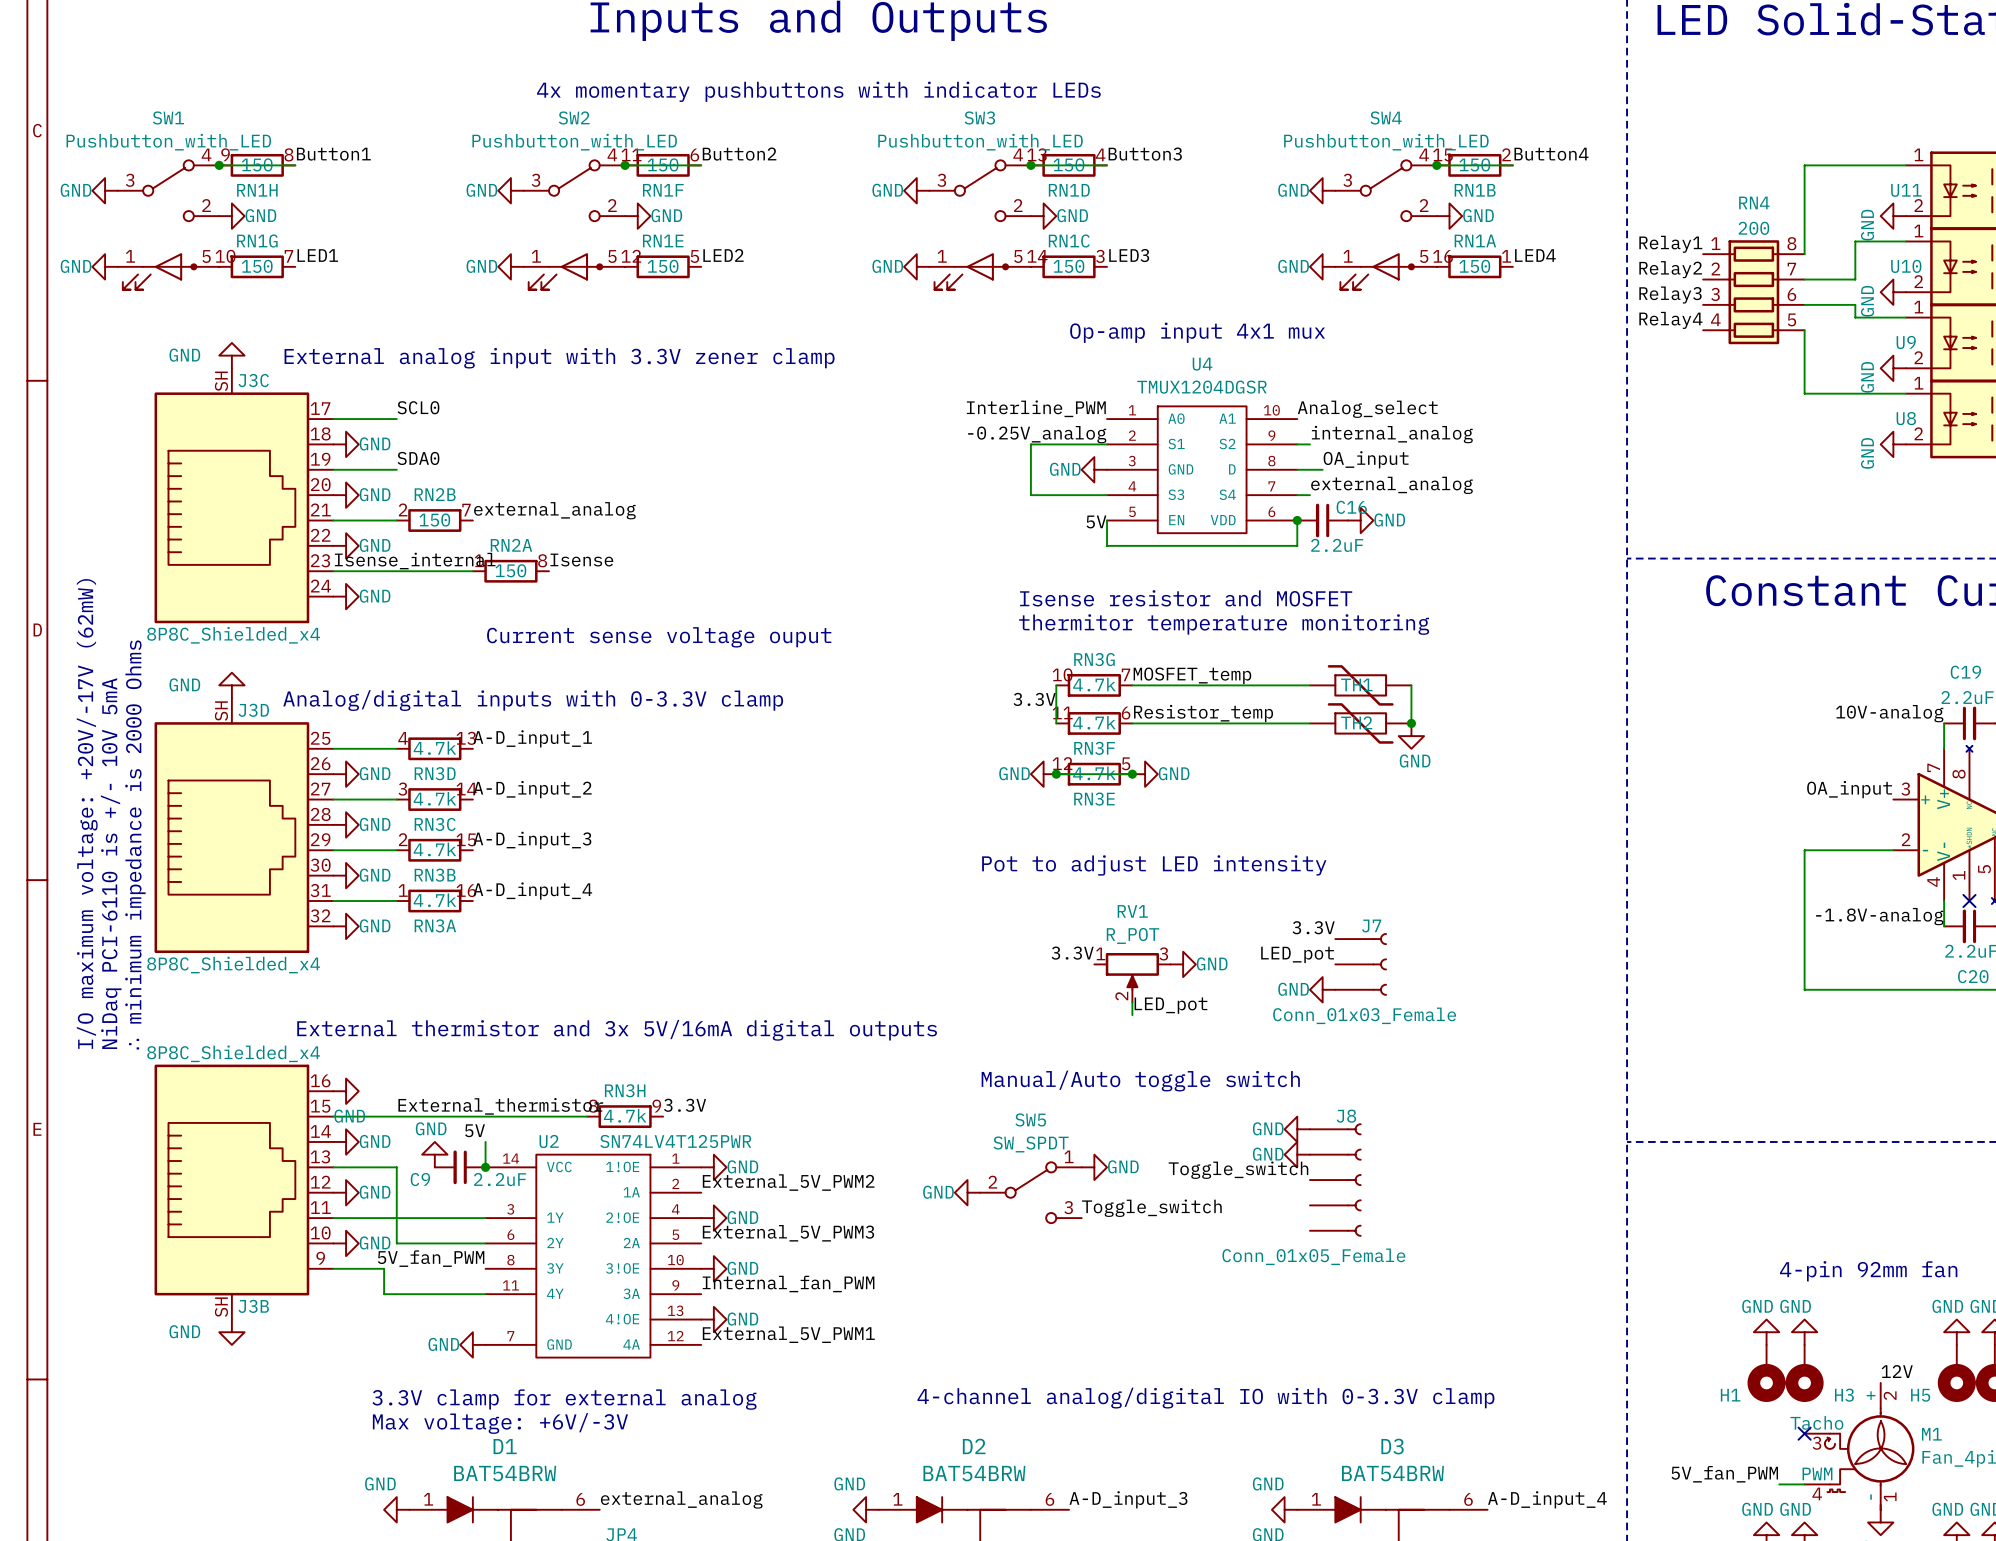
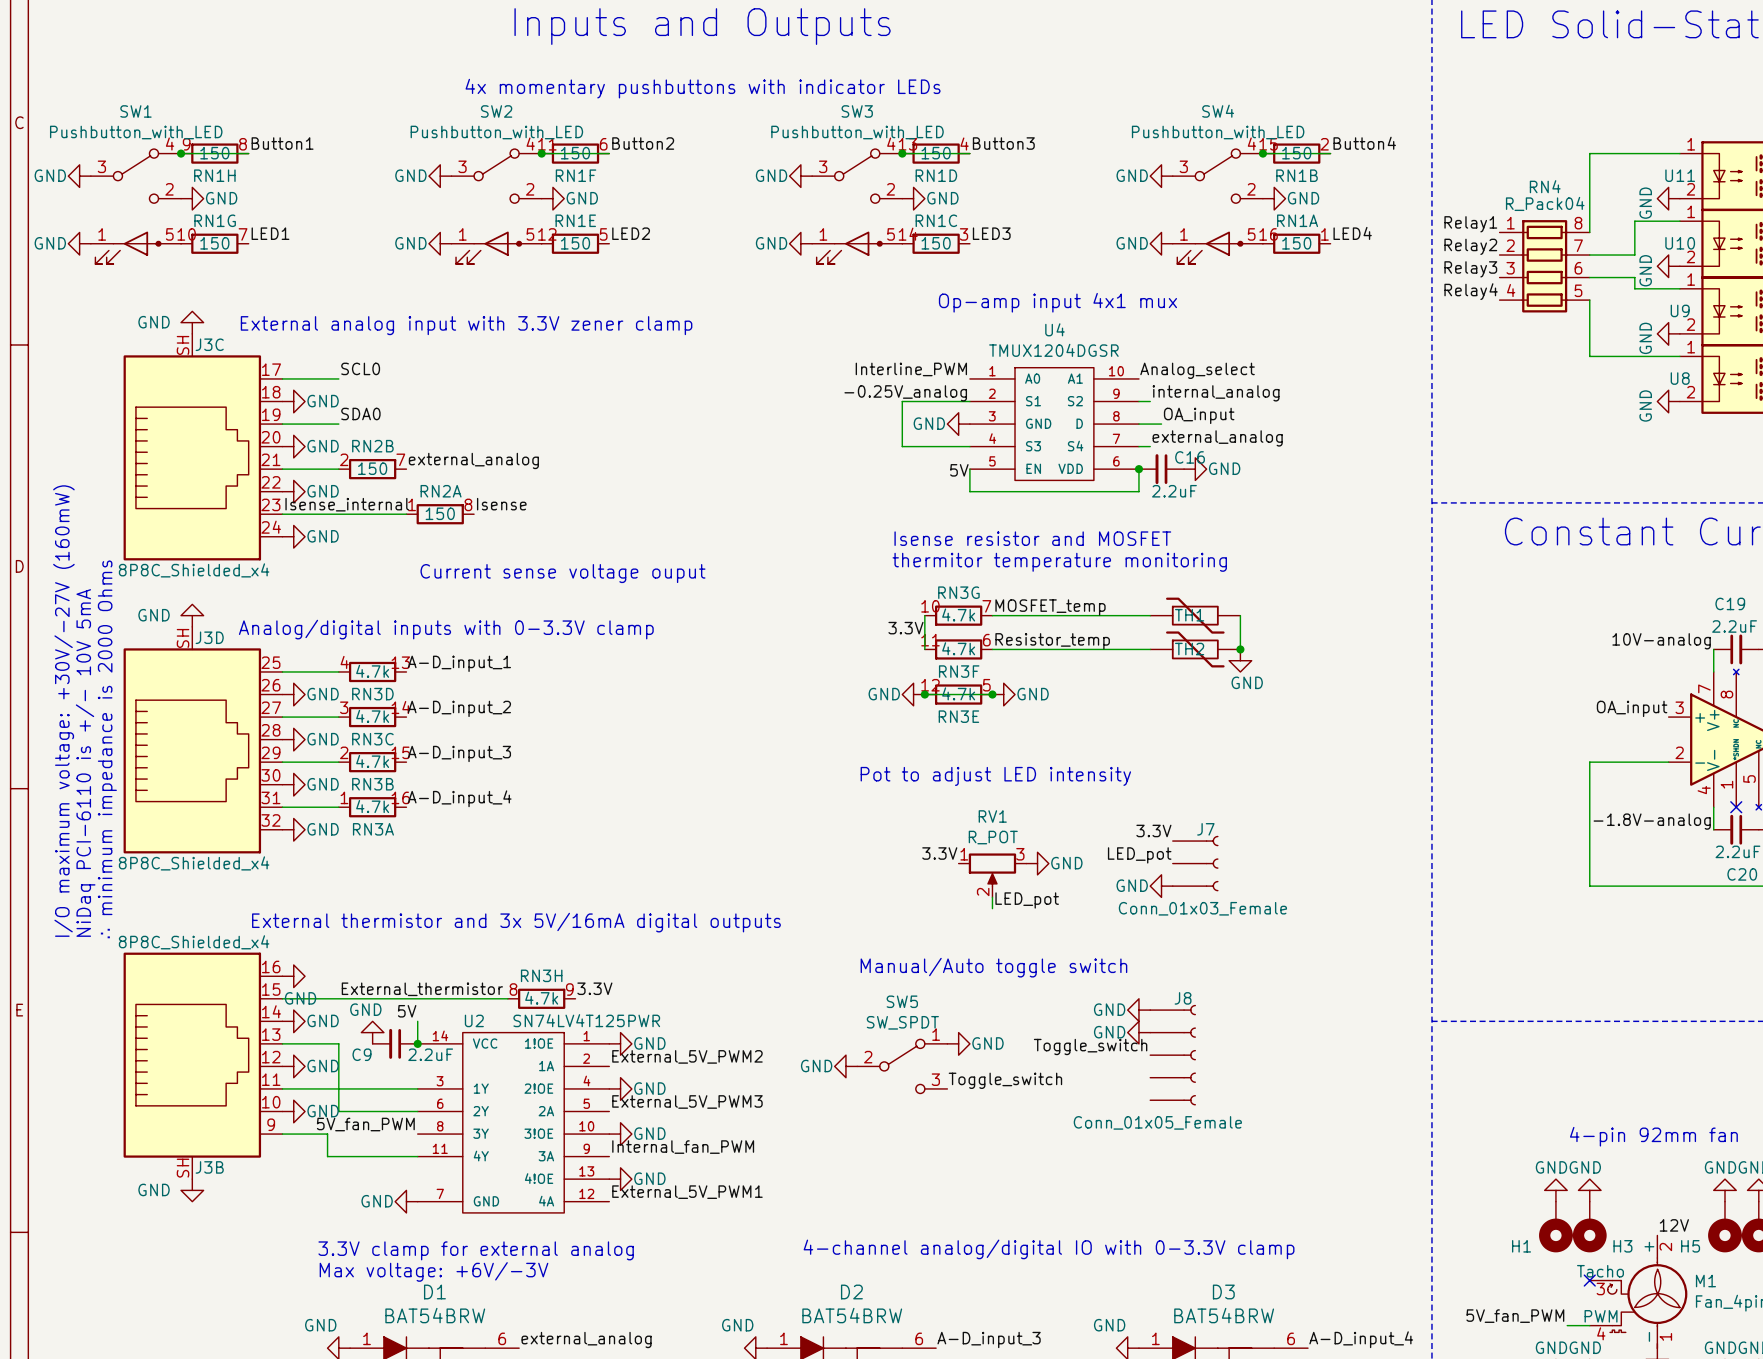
RN4 value: 200 (1753, 228) -> R_Pack04 (1545, 203)
text: I/O maximum voltage: +20V/-17V (62mW) (87, 813) -> I/O maximum voltage: +30V/-27V (160mW) (63, 711)

